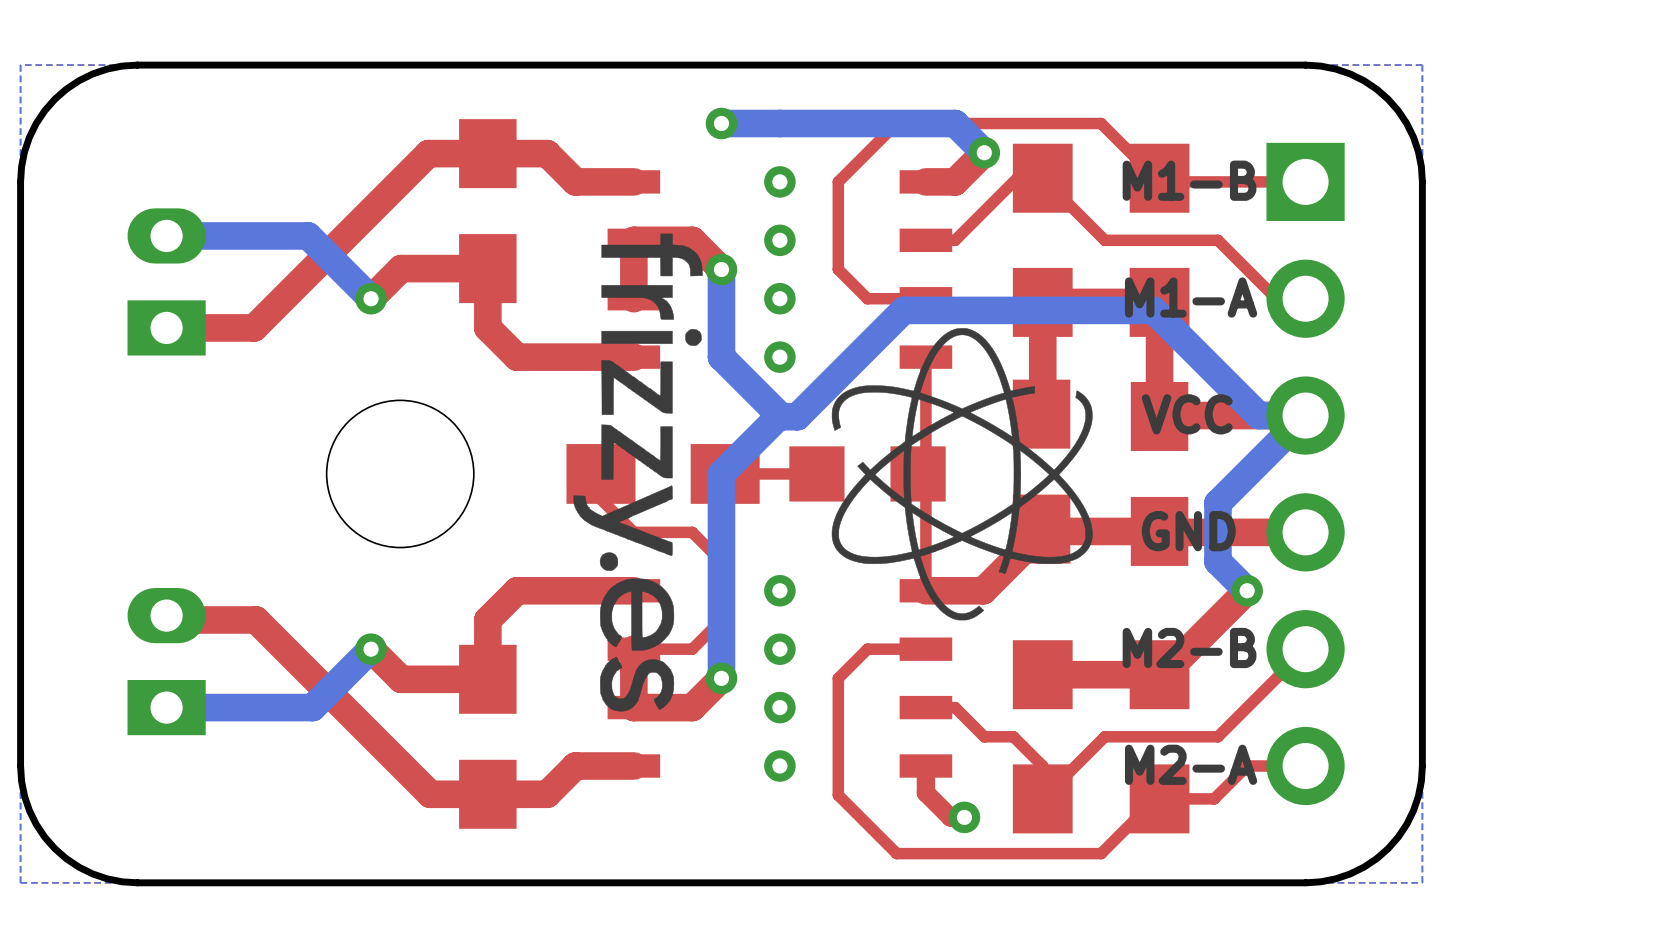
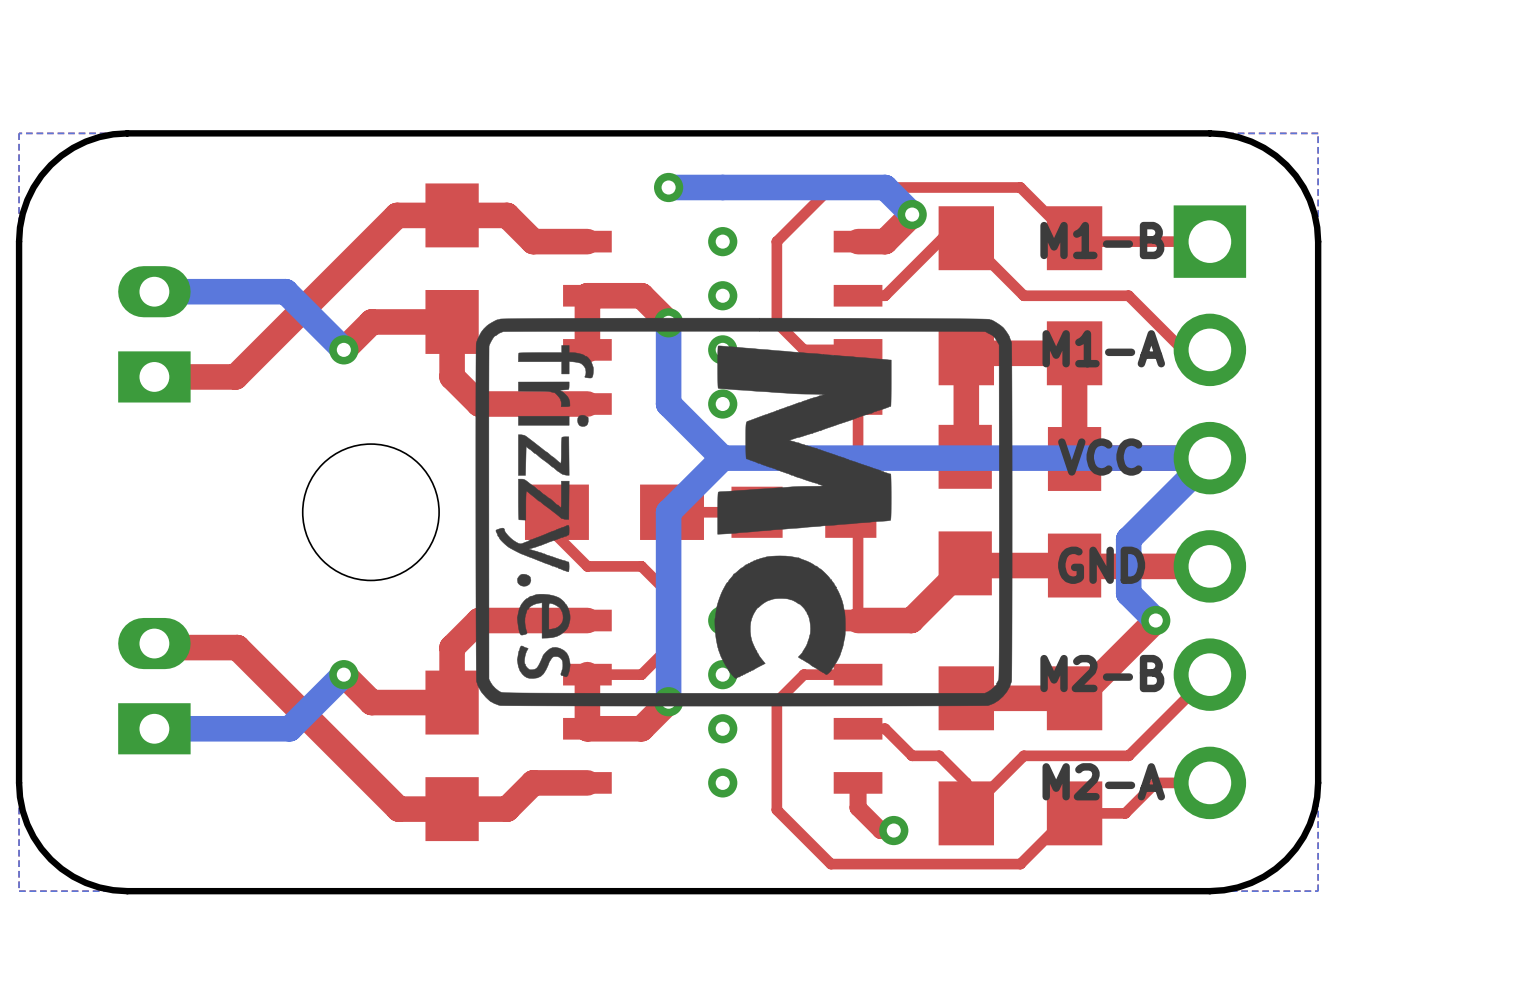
drawing: [573, 233, 703, 712] -> none
drawing: none -> [475, 317, 1013, 707]
drawing: [831, 328, 1093, 621] -> none
bottom track: (1258, 415) (1153, 310) (903, 310) (797, 416) (778, 416) -> (1166, 458) (722, 458)

